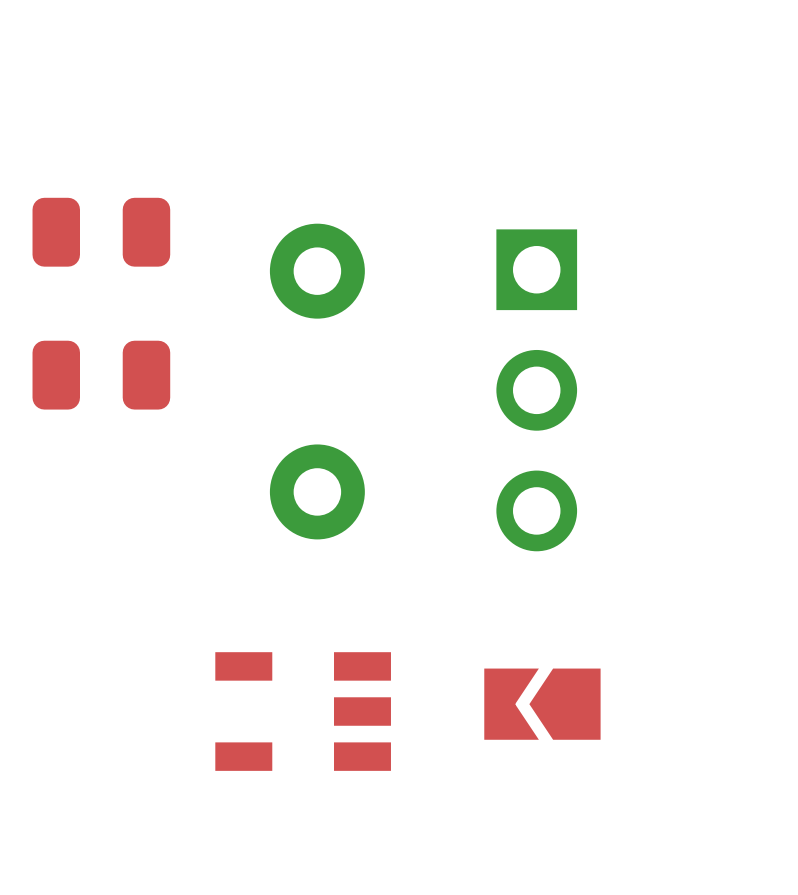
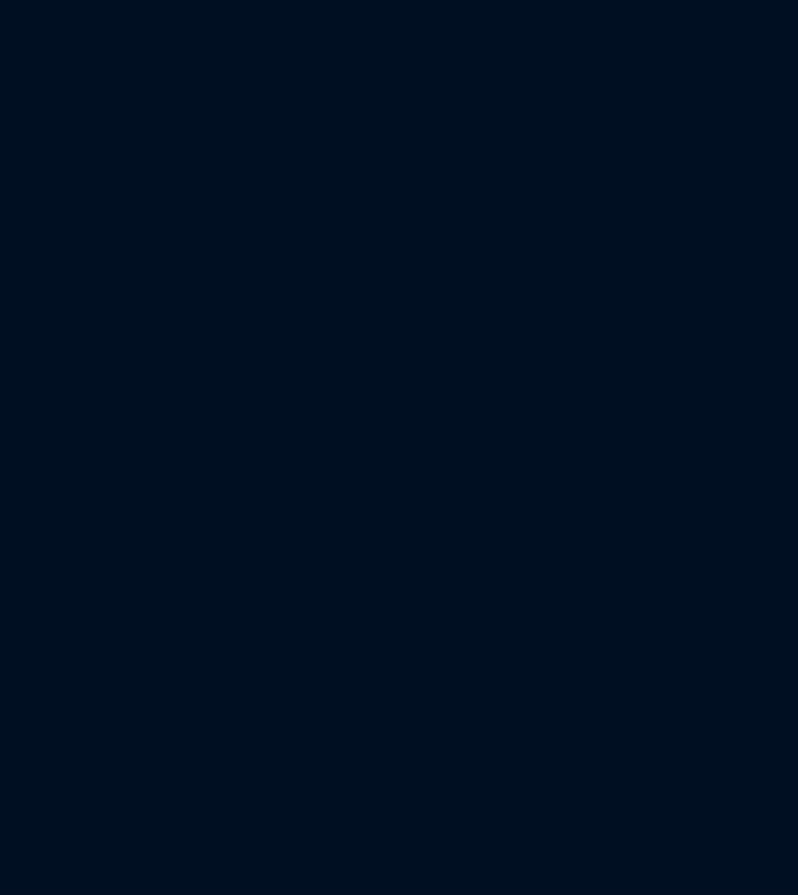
part: (101, 232) -> none
part: (317, 271) -> none
part: (101, 375) -> none
part: (536, 390) -> none
part: (317, 491) -> none
part: (542, 704) -> none
part: (303, 711) -> none

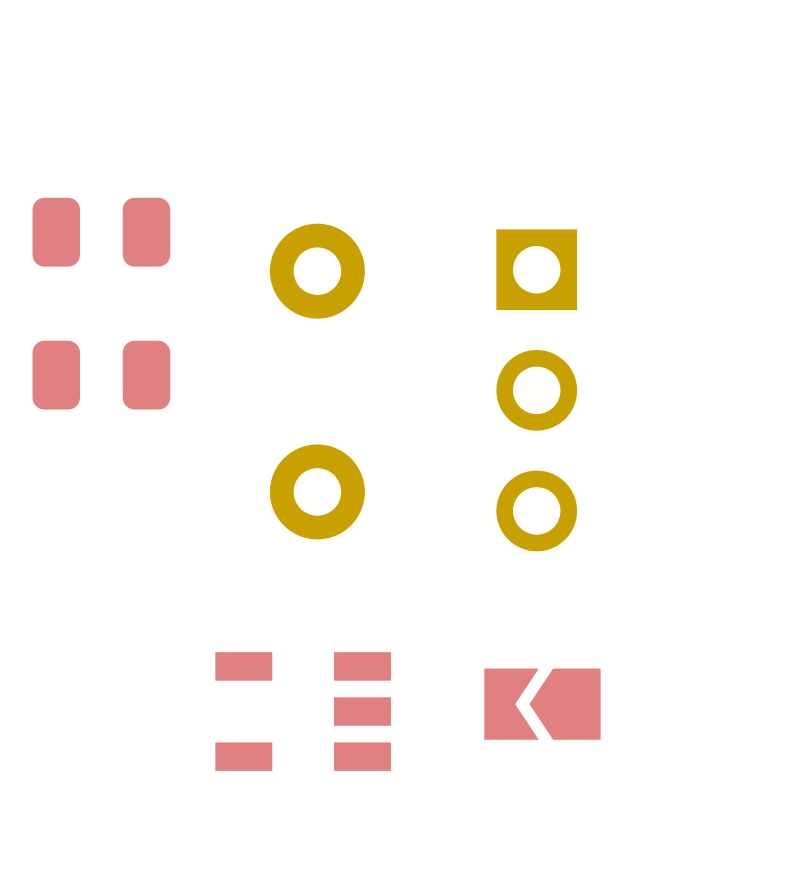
part: none -> (101, 232)
part: none -> (317, 271)
part: none -> (101, 375)
part: none -> (536, 390)
part: none -> (317, 491)
part: none -> (542, 704)
part: none -> (303, 711)

